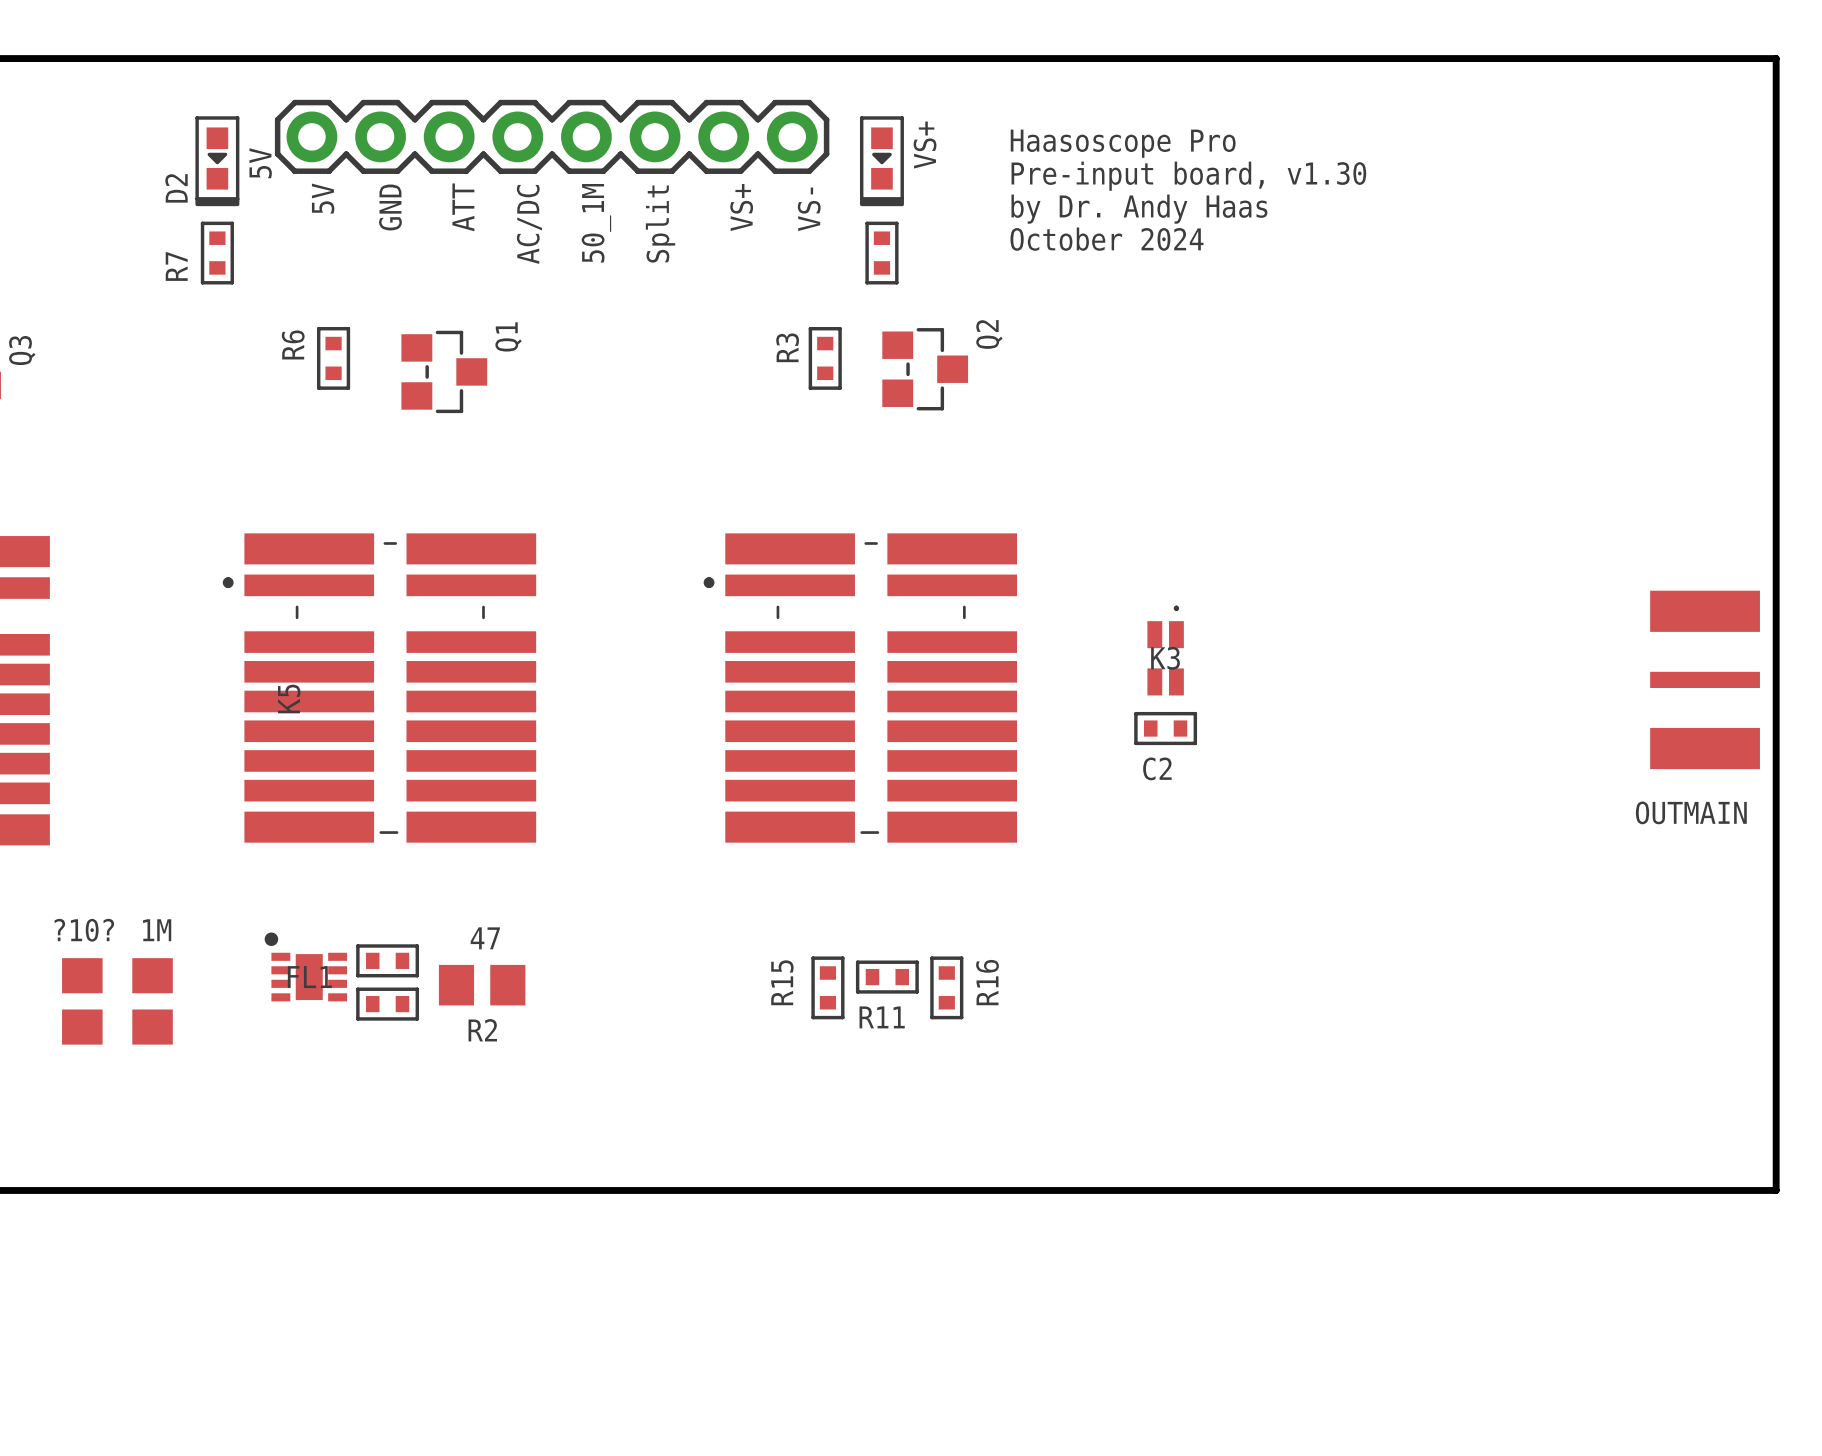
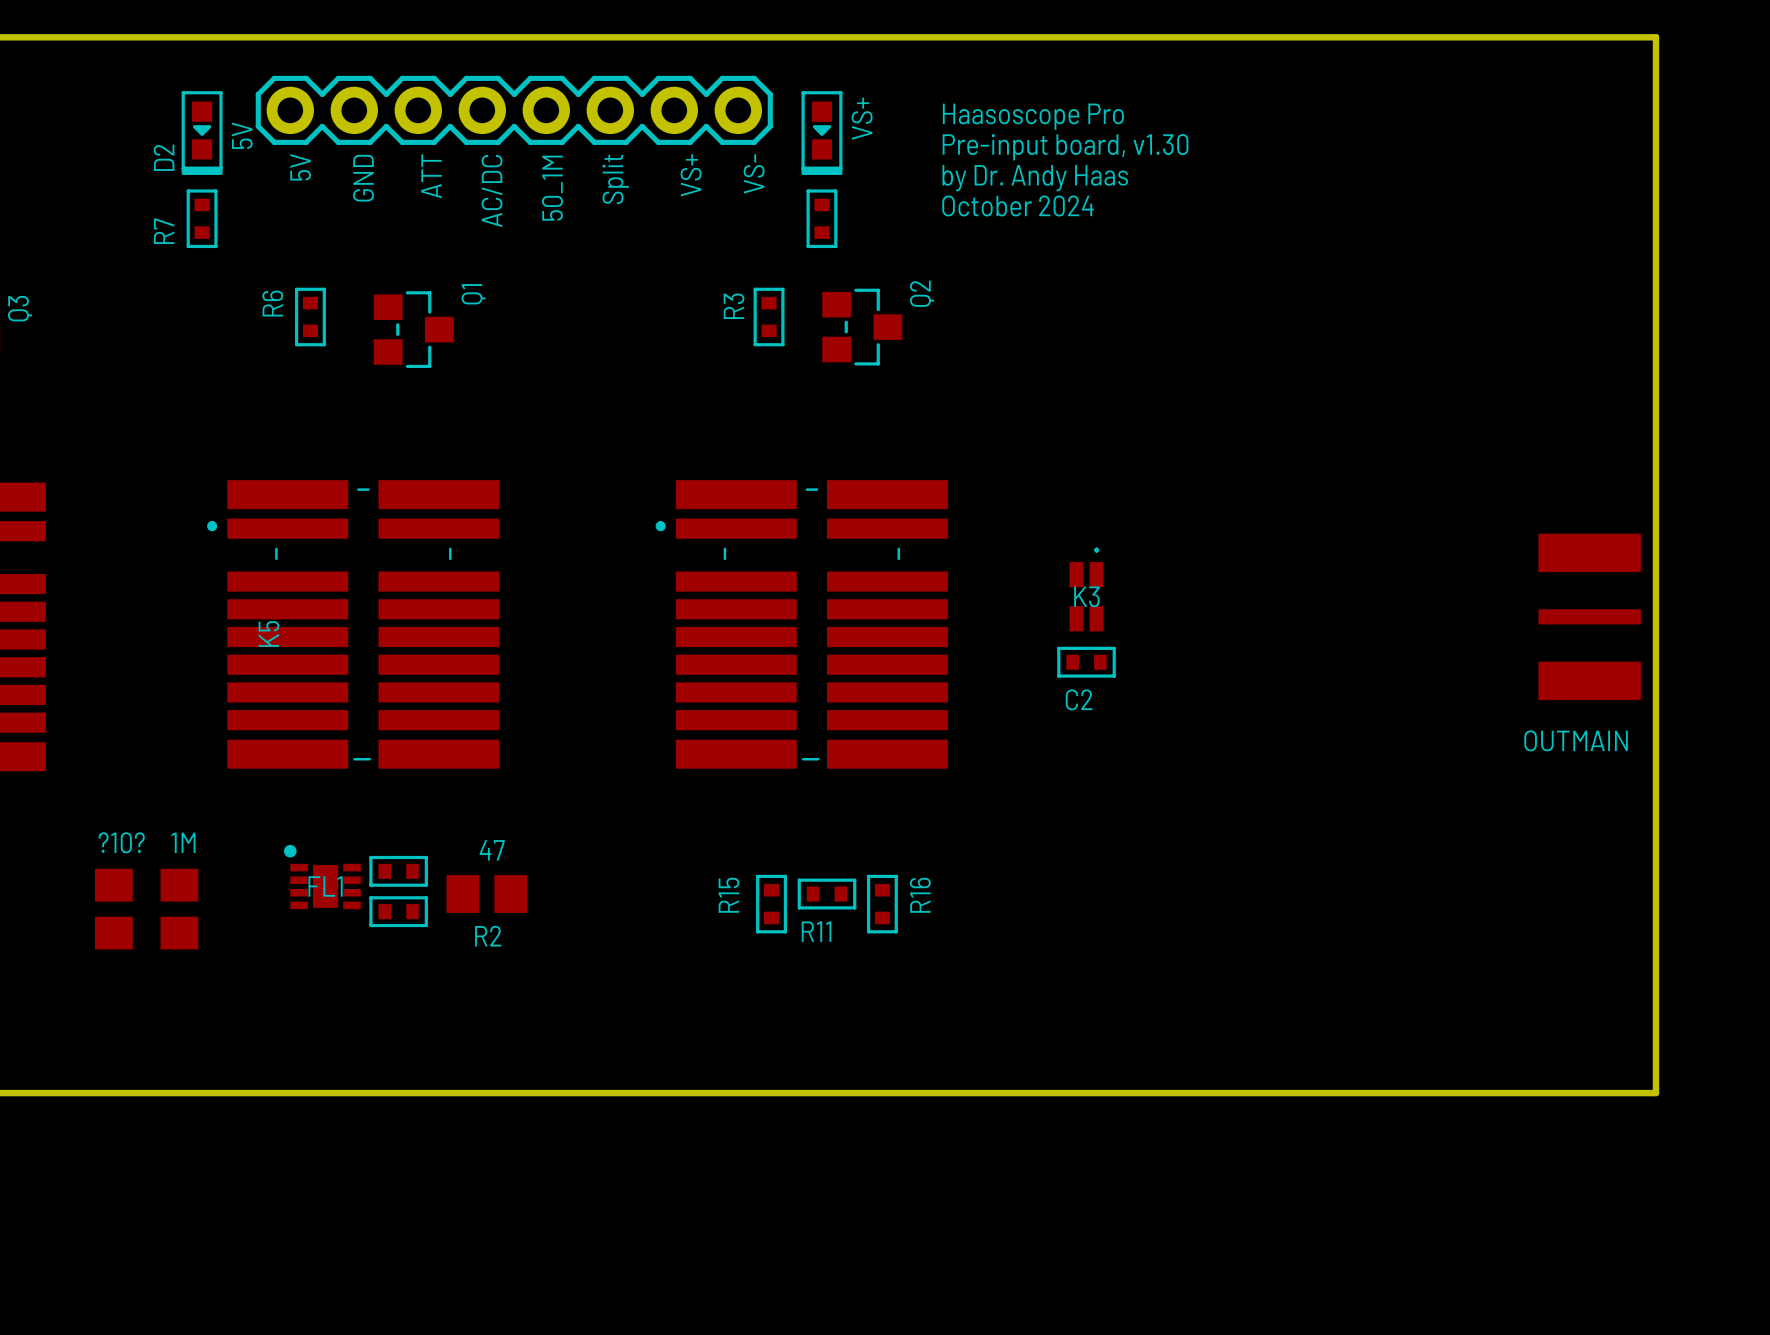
part: none -> (398, 871)
part: (387, 960) -> none
FL1 position: (305, 966) -> (322, 877)
R2 position: (482, 985) -> (486, 894)
part: none -> (398, 911)
part position: (82, 1001) -> (113, 909)
part position: (152, 1001) -> (179, 909)
part: (387, 1004) -> none

